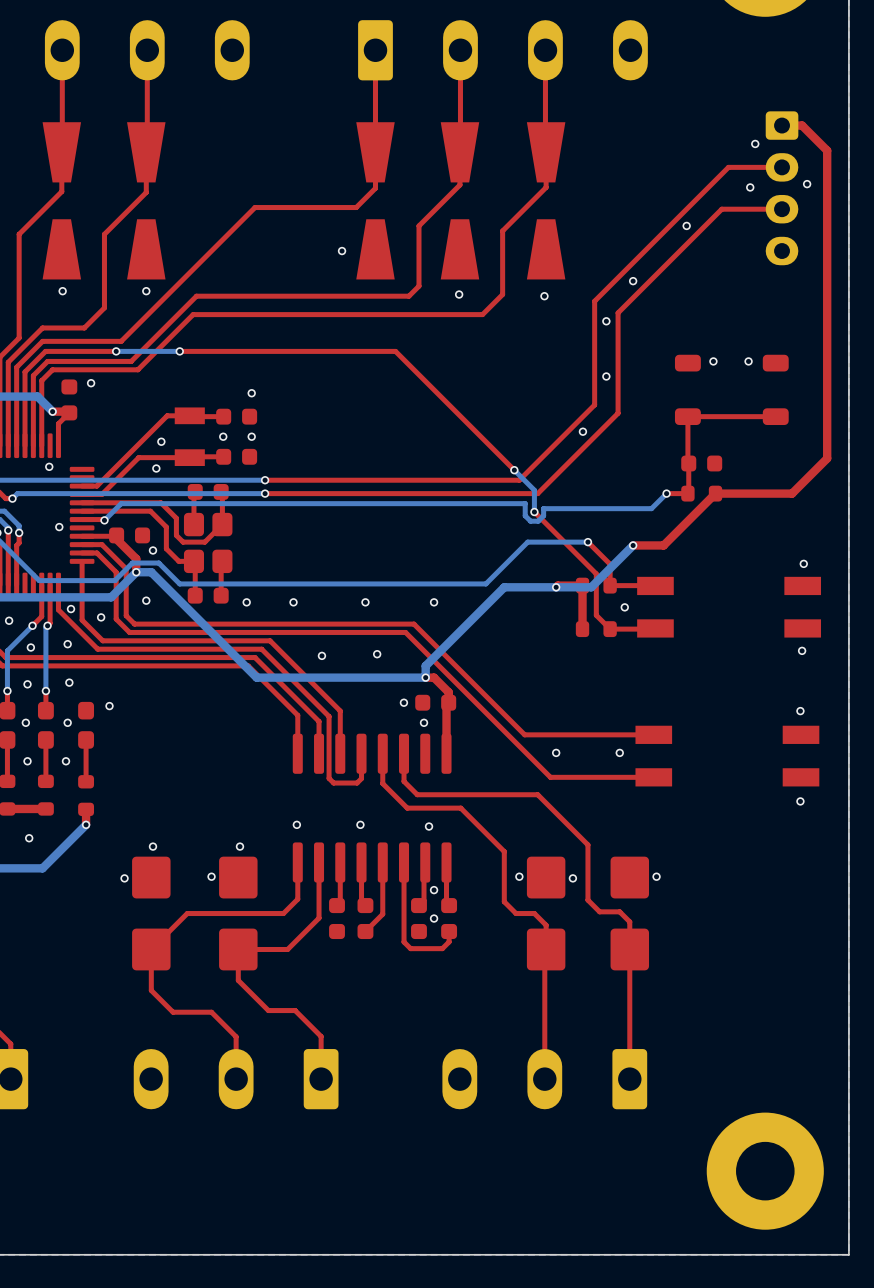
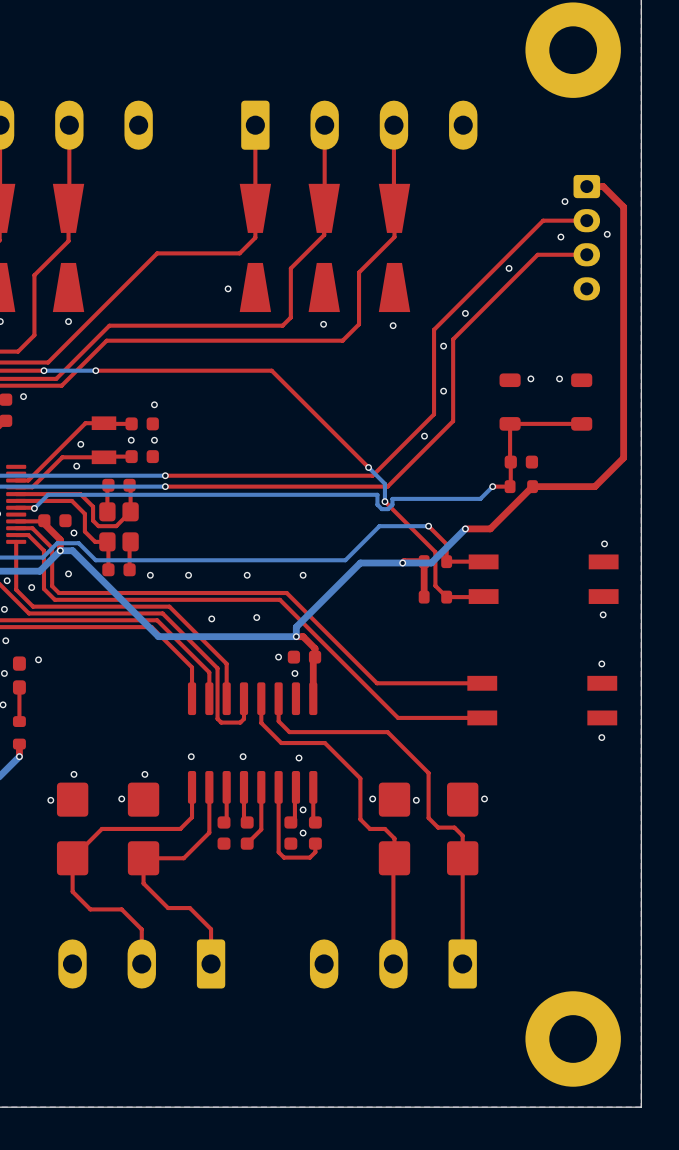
via: (624, 607) -> none
via: (556, 752) -> none
via: (619, 752) -> none

